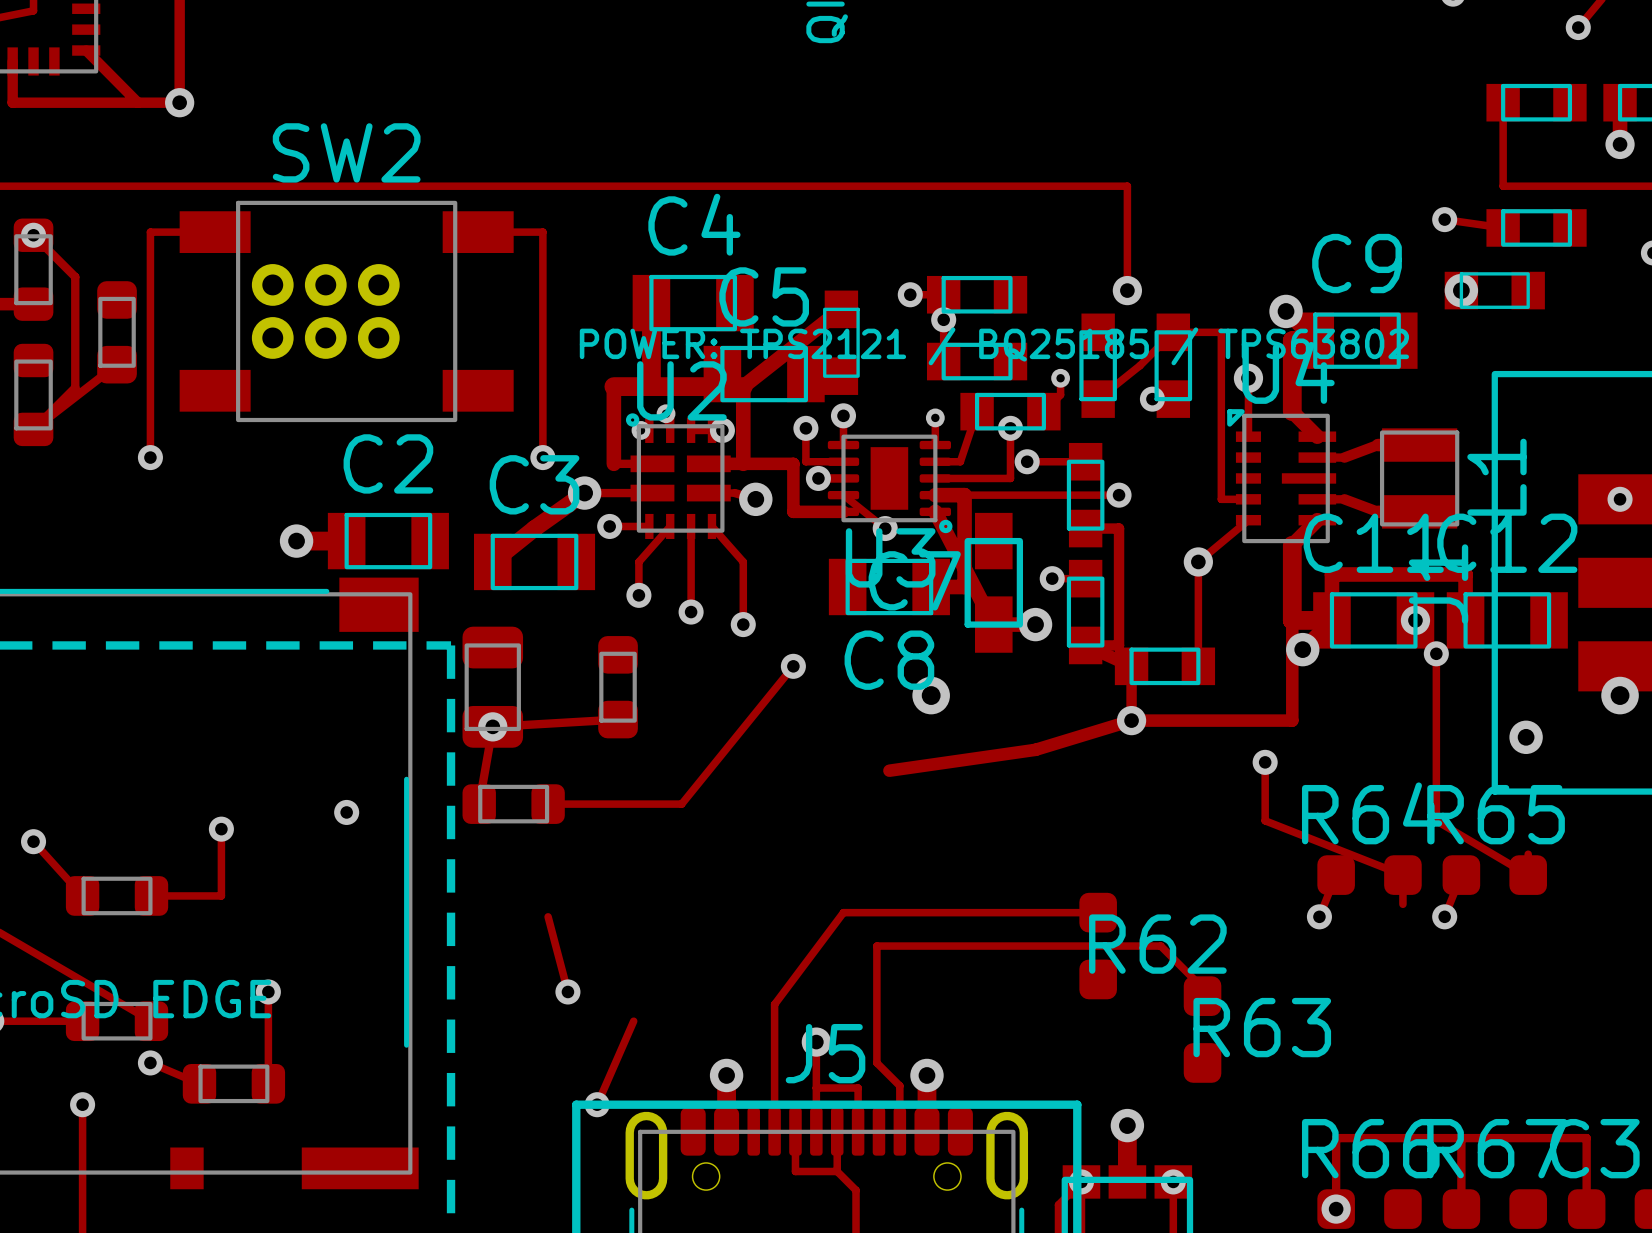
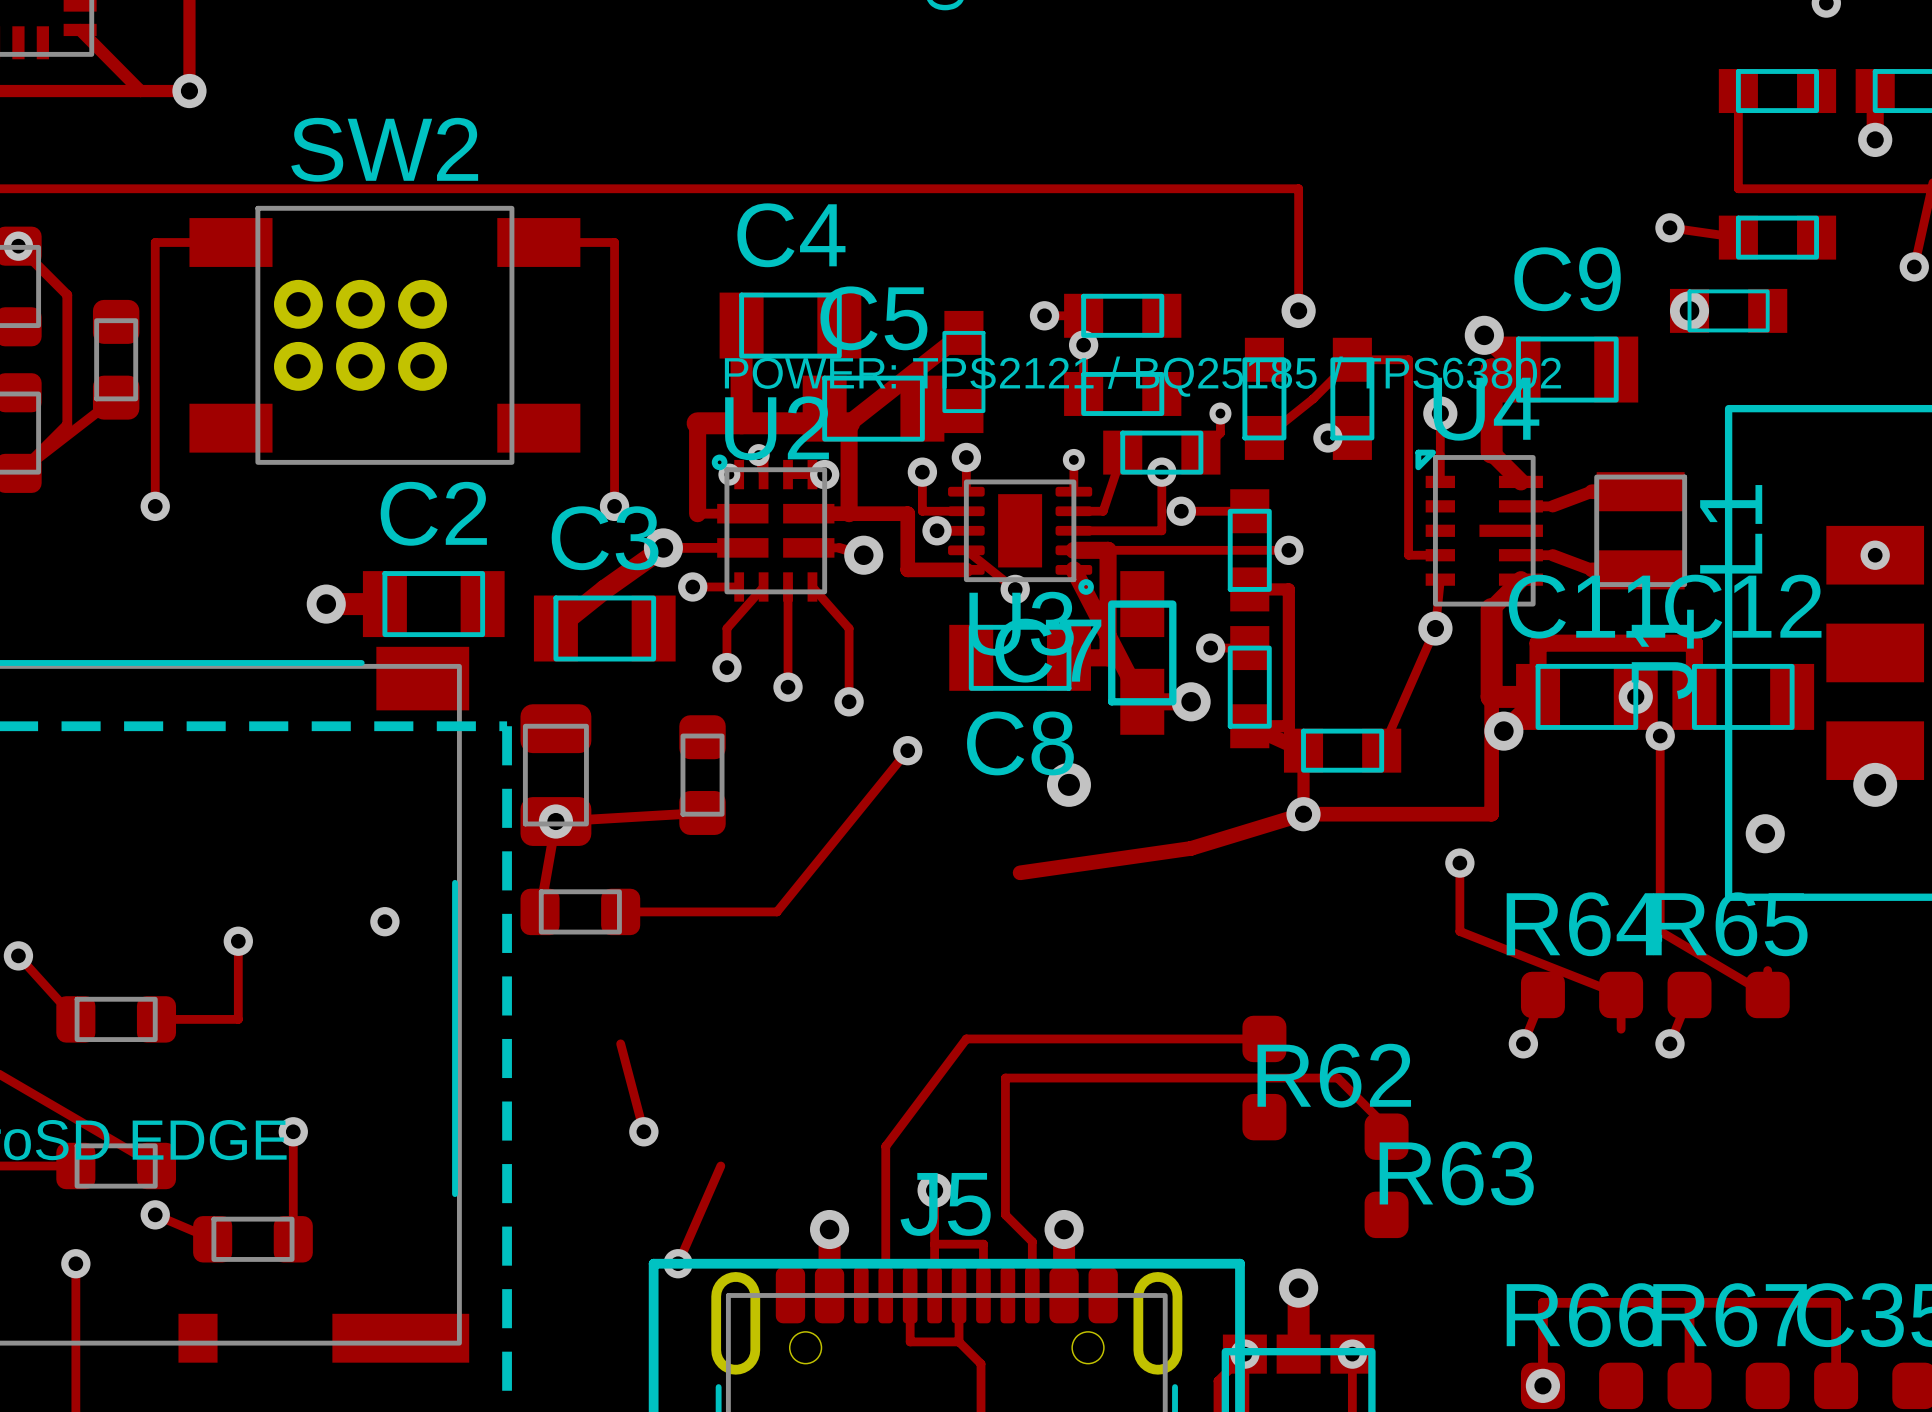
track: (1248, 520) (1198, 561) (1198, 666) -> (1440, 579) (1435, 628) (1381, 750)
via position: (1198, 561) -> (1435, 628)

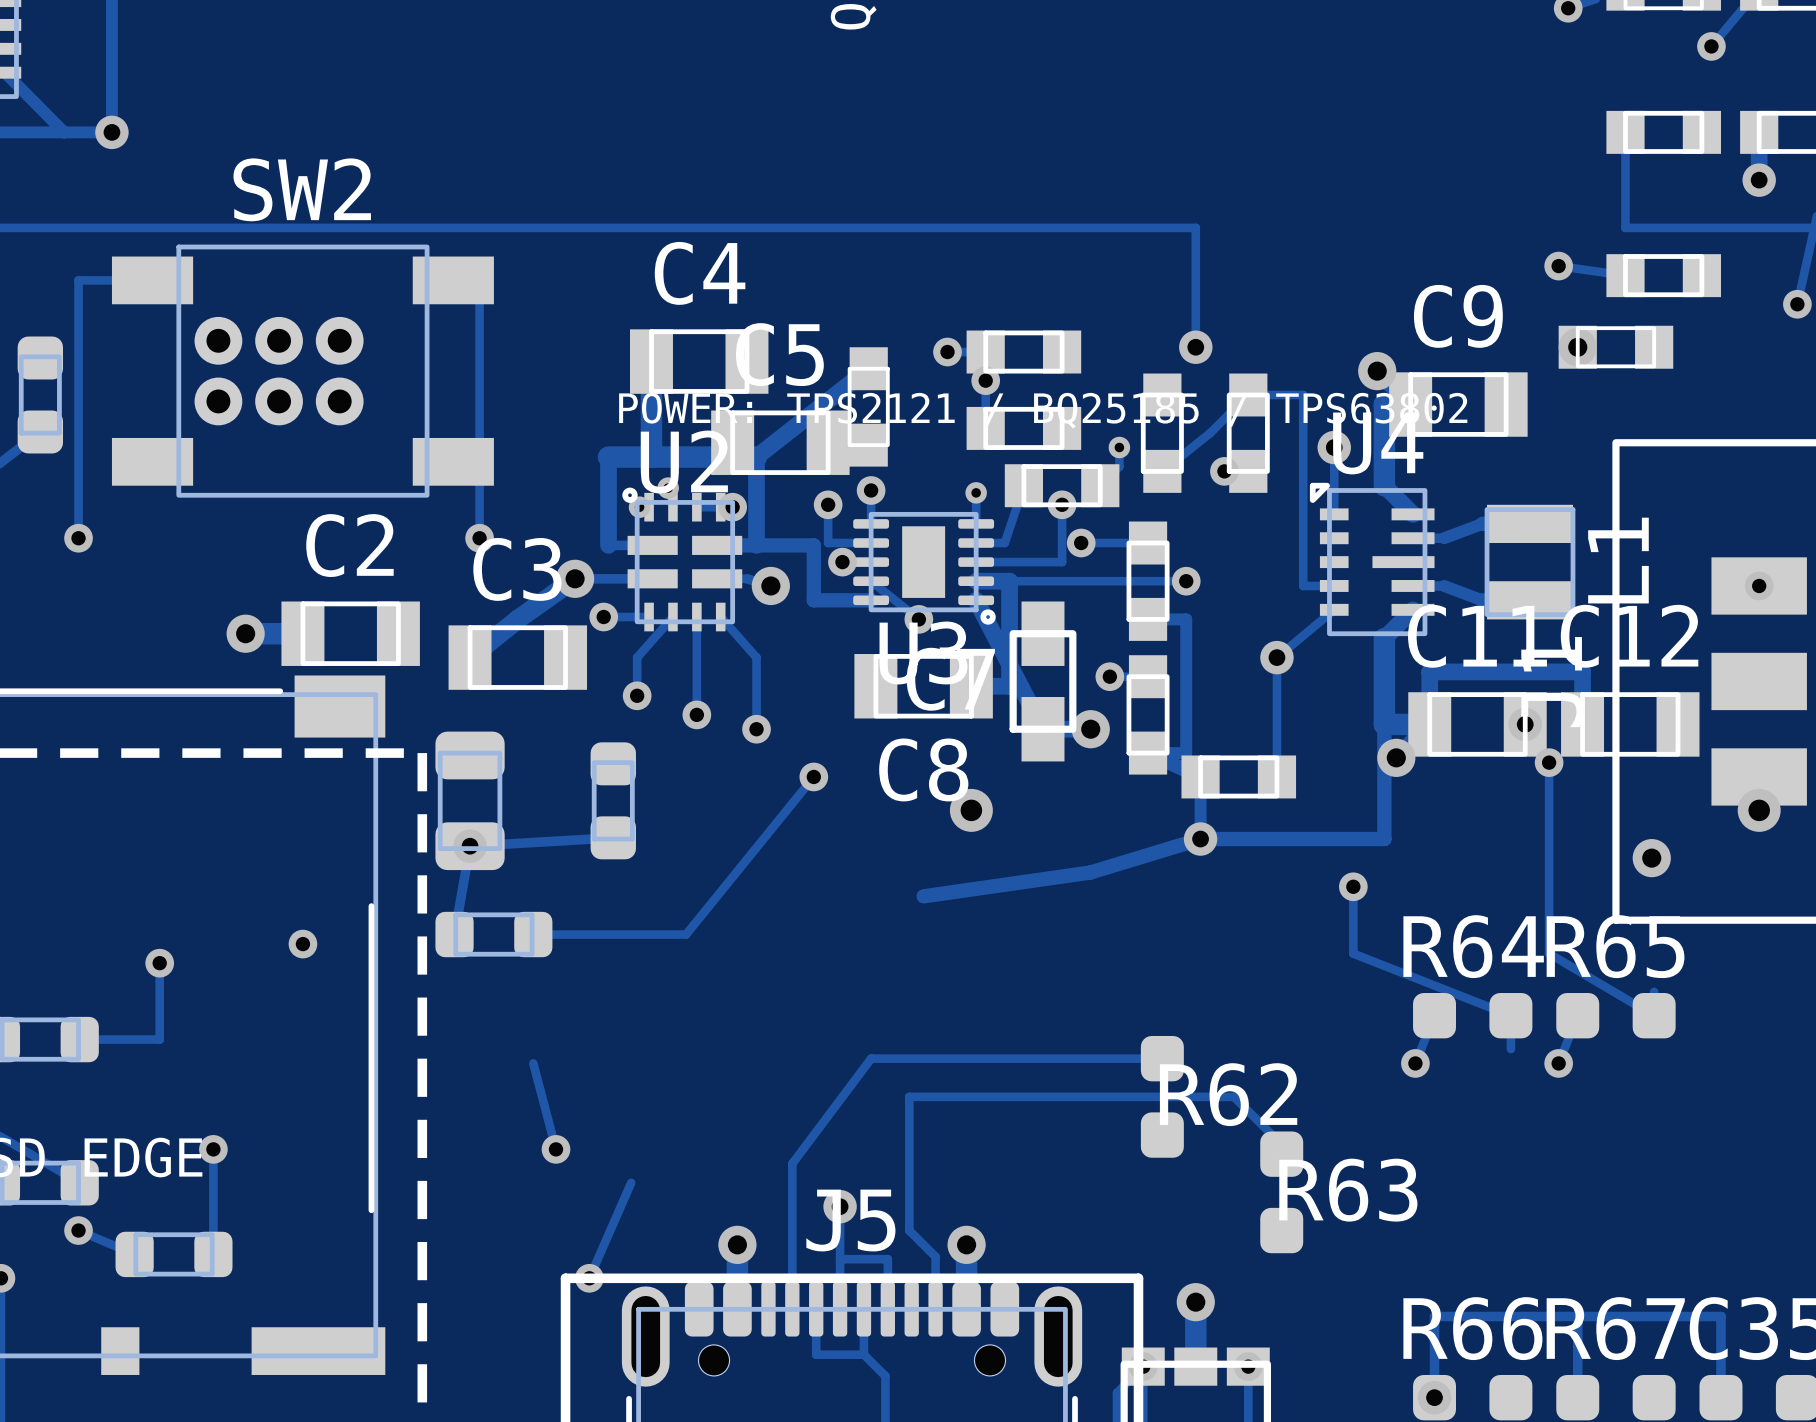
track: (565, 242) (614, 242) (614, 506) -> (479, 280) (479, 538)
via position: (614, 506) -> (479, 538)
track: (1440, 579) (1435, 628) (1381, 750) -> (1334, 609) (1276, 657) (1276, 776)
via position: (1435, 628) -> (1276, 657)

